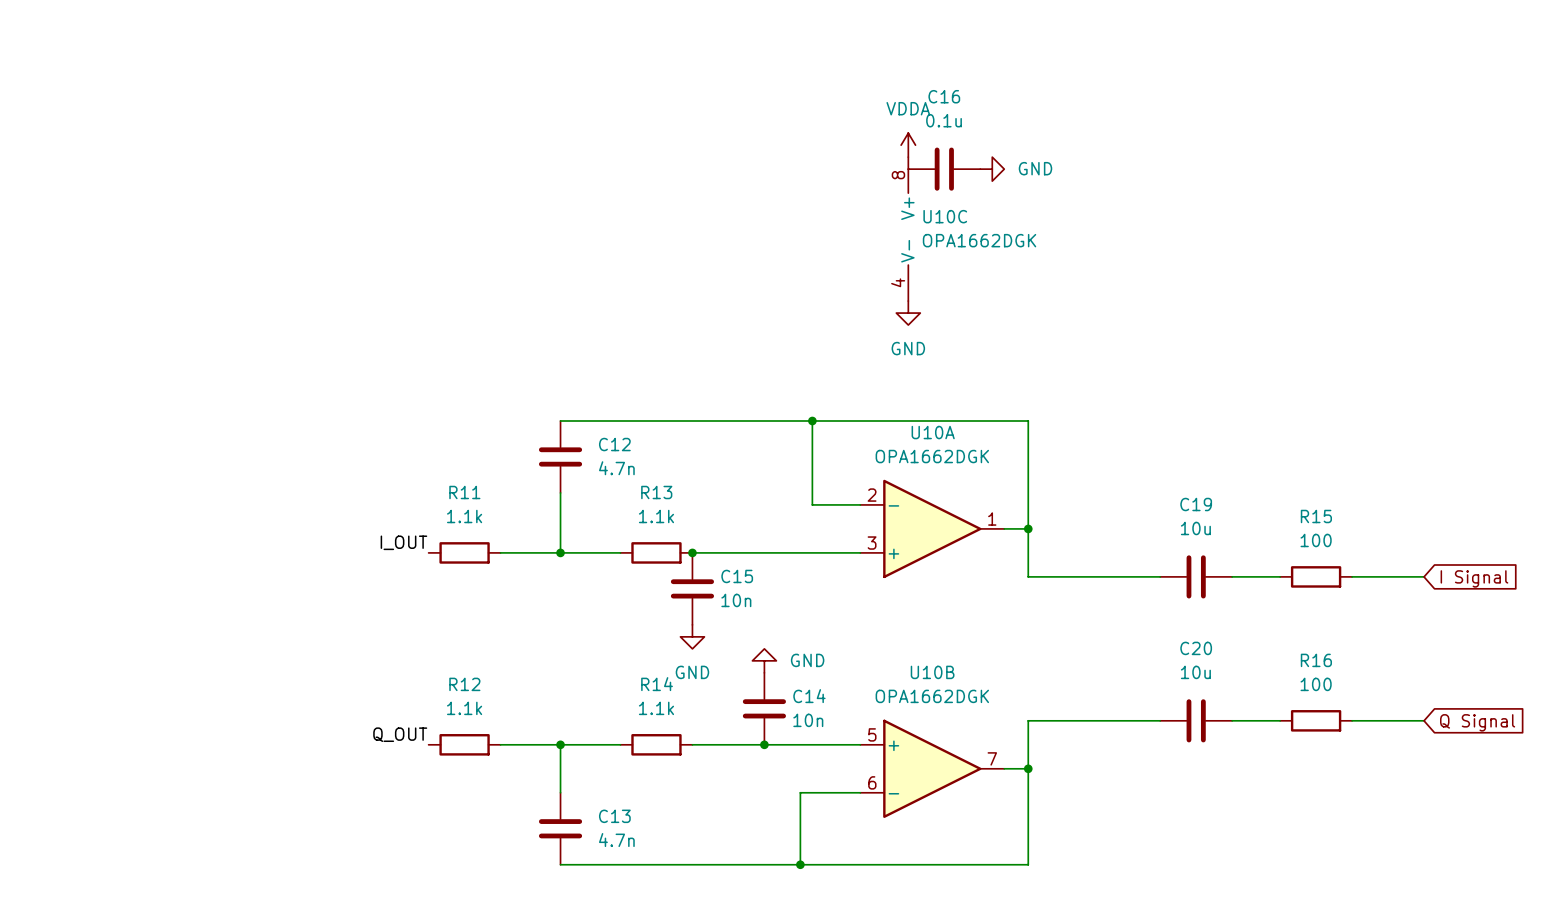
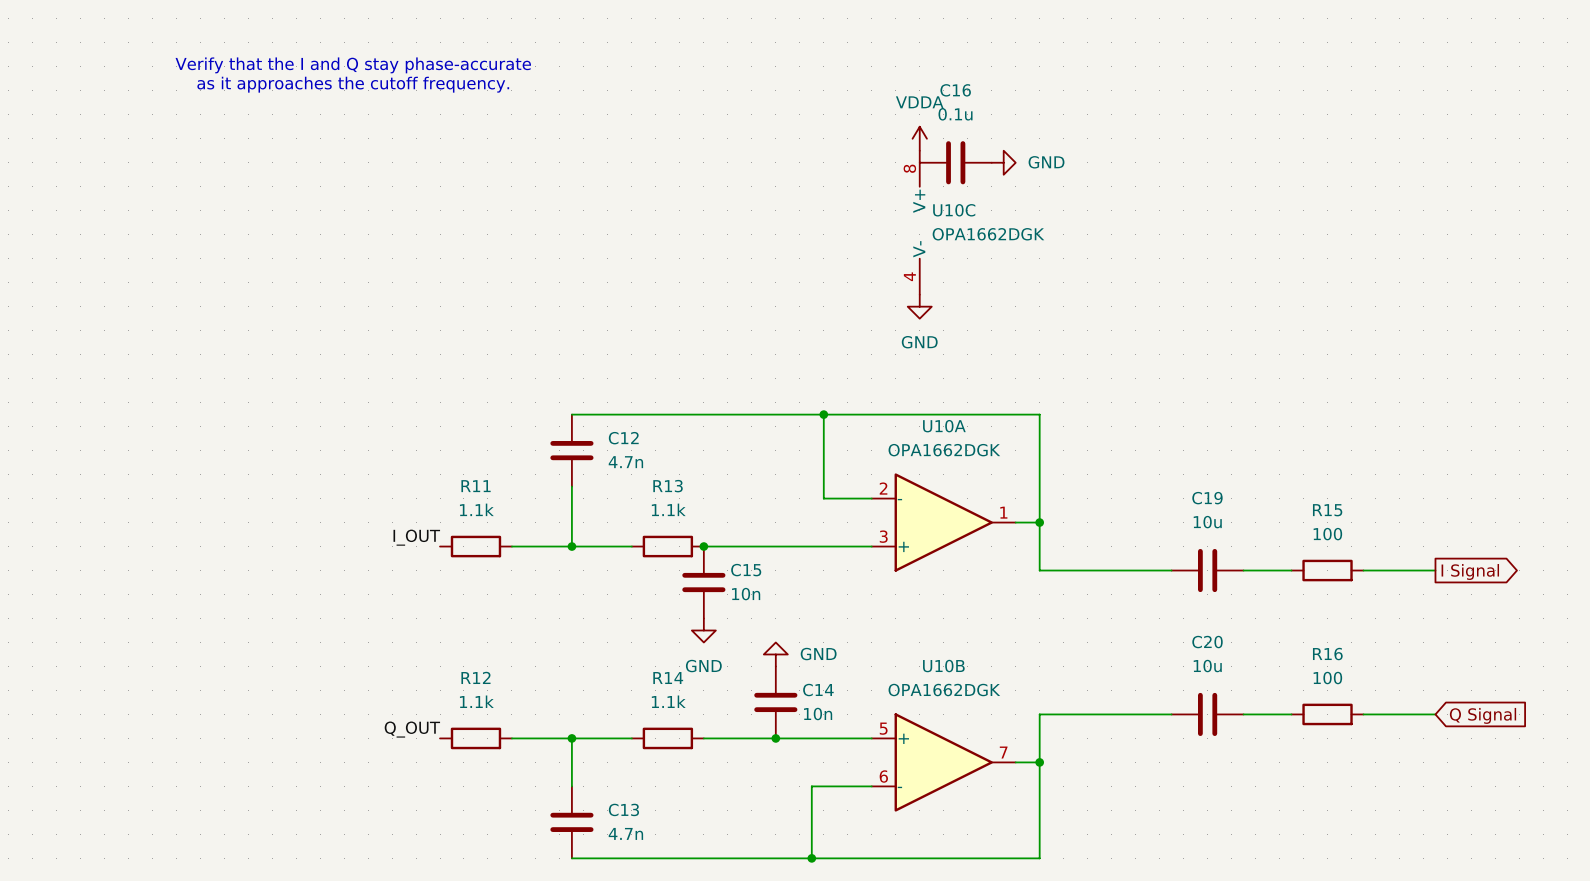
text: none -> Verify that the I and Q stay phase-accurate (353, 65)
text: none -> as it approaches the cutoff frequency. (353, 84)
global label shape: input (1474, 578) -> output (1470, 571)

